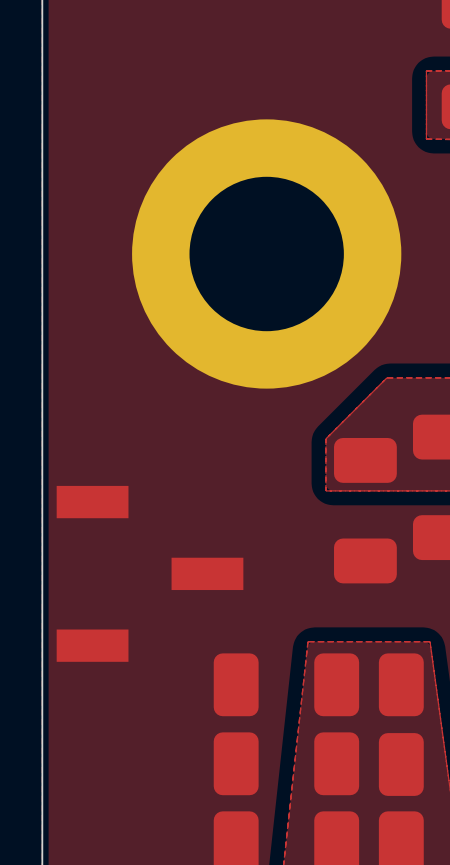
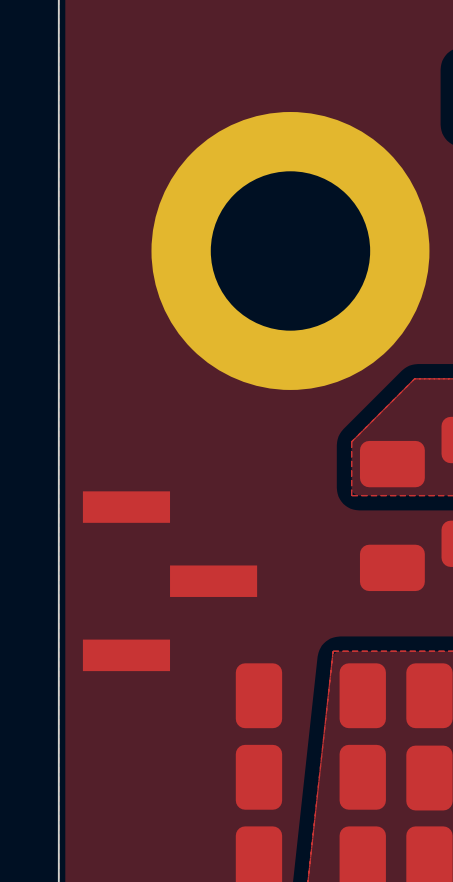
part footprint: [56, 485, 244, 662] -> [82, 491, 258, 672]

